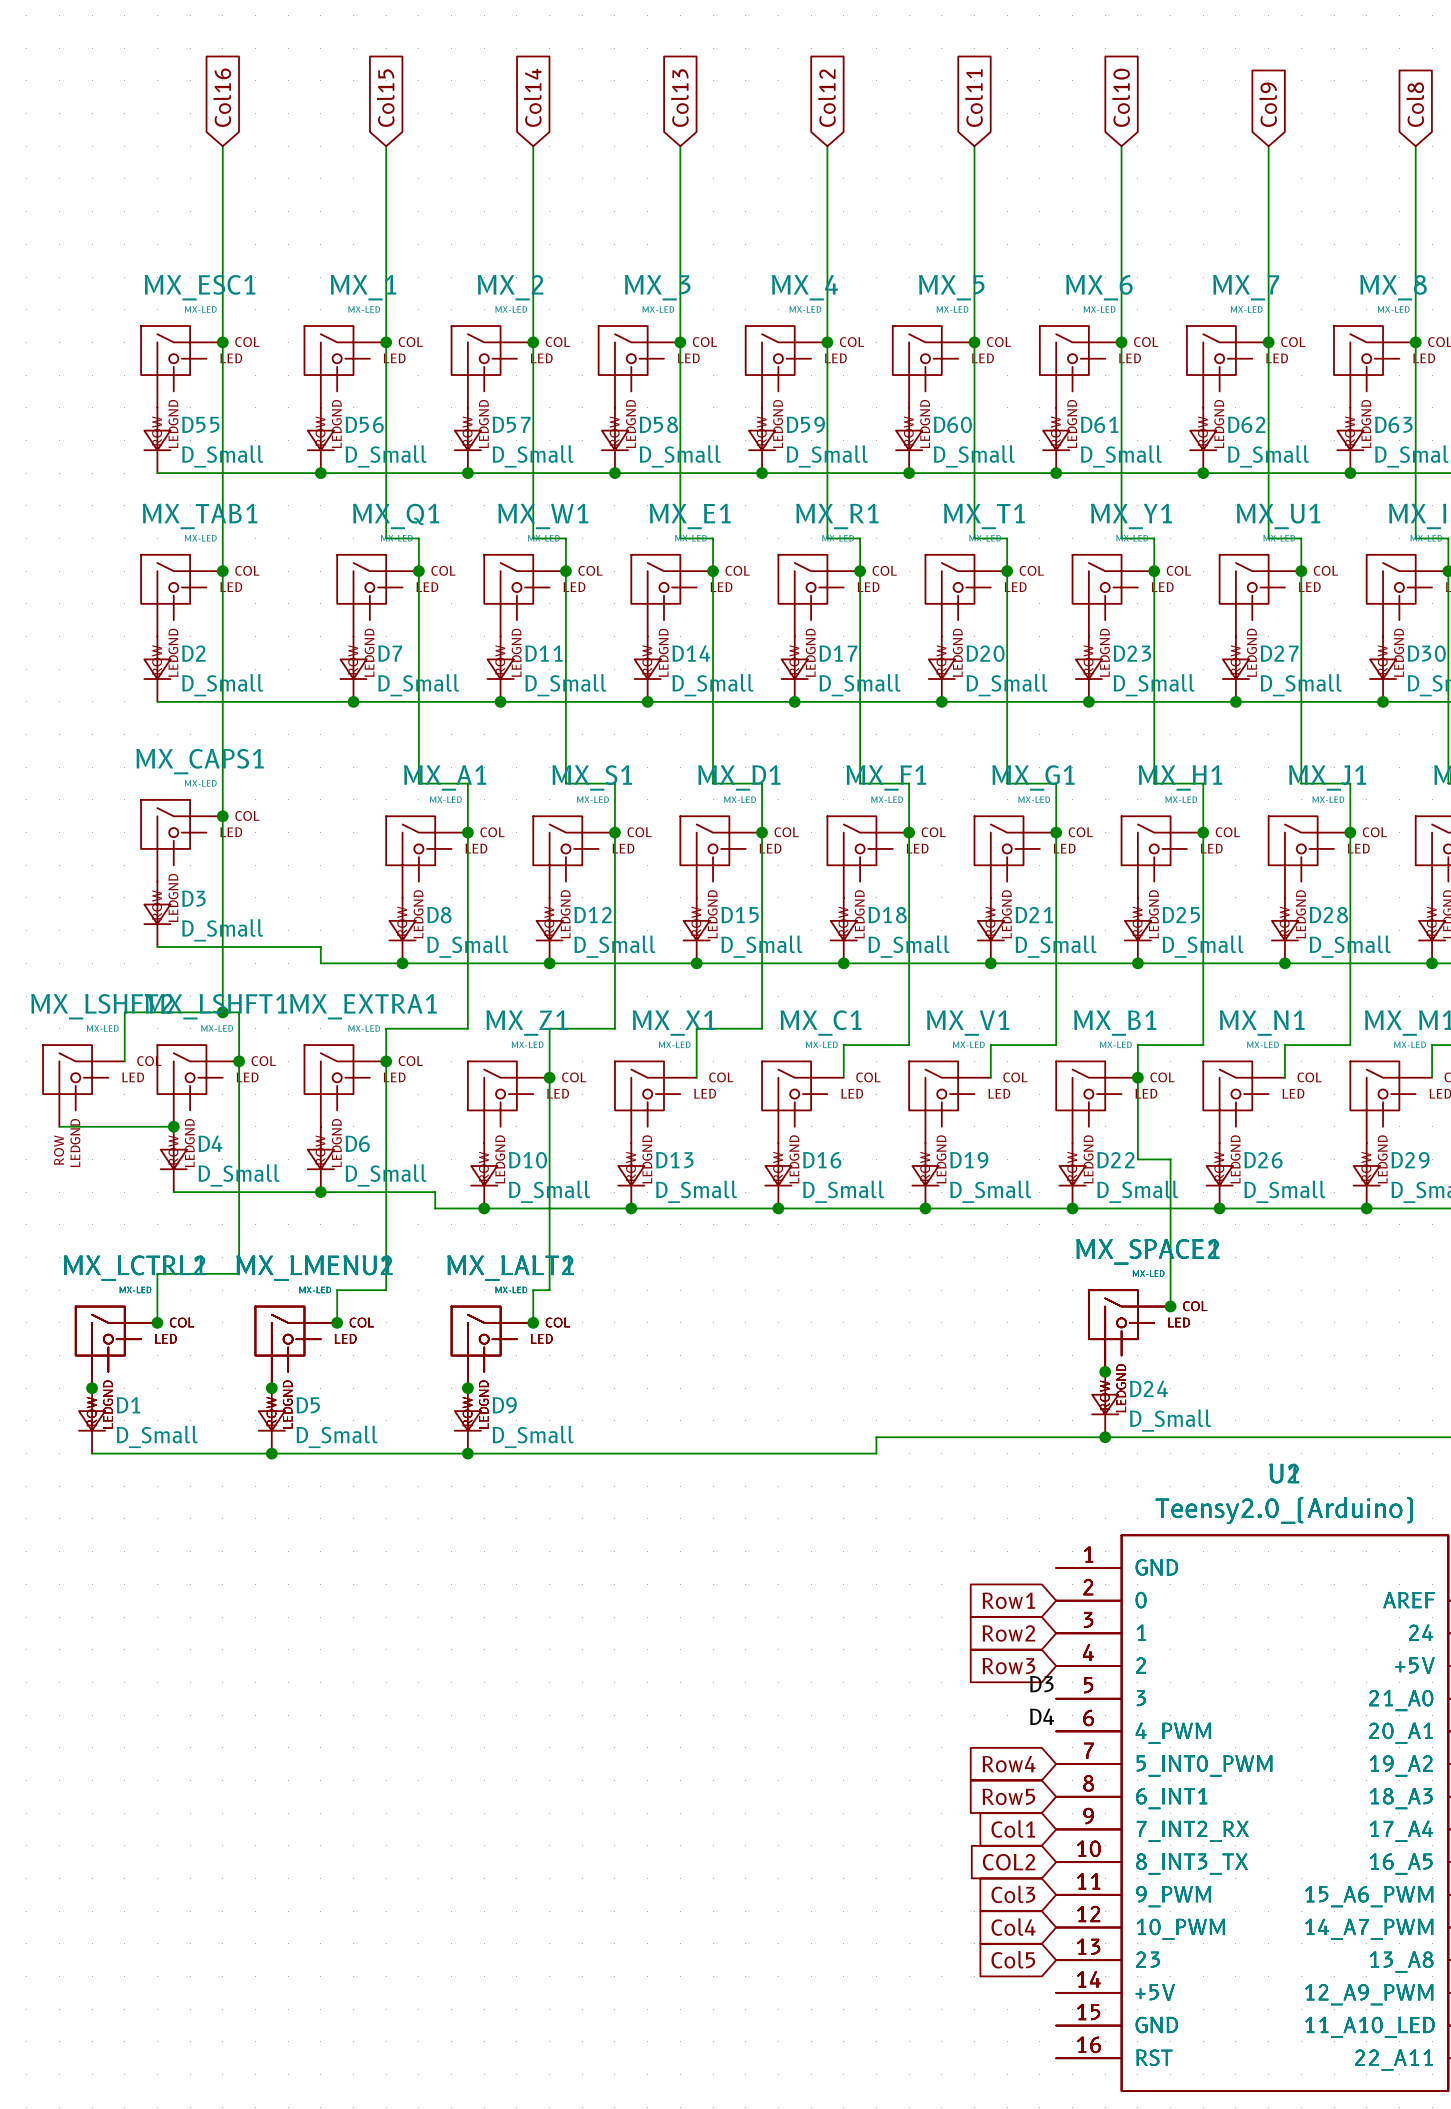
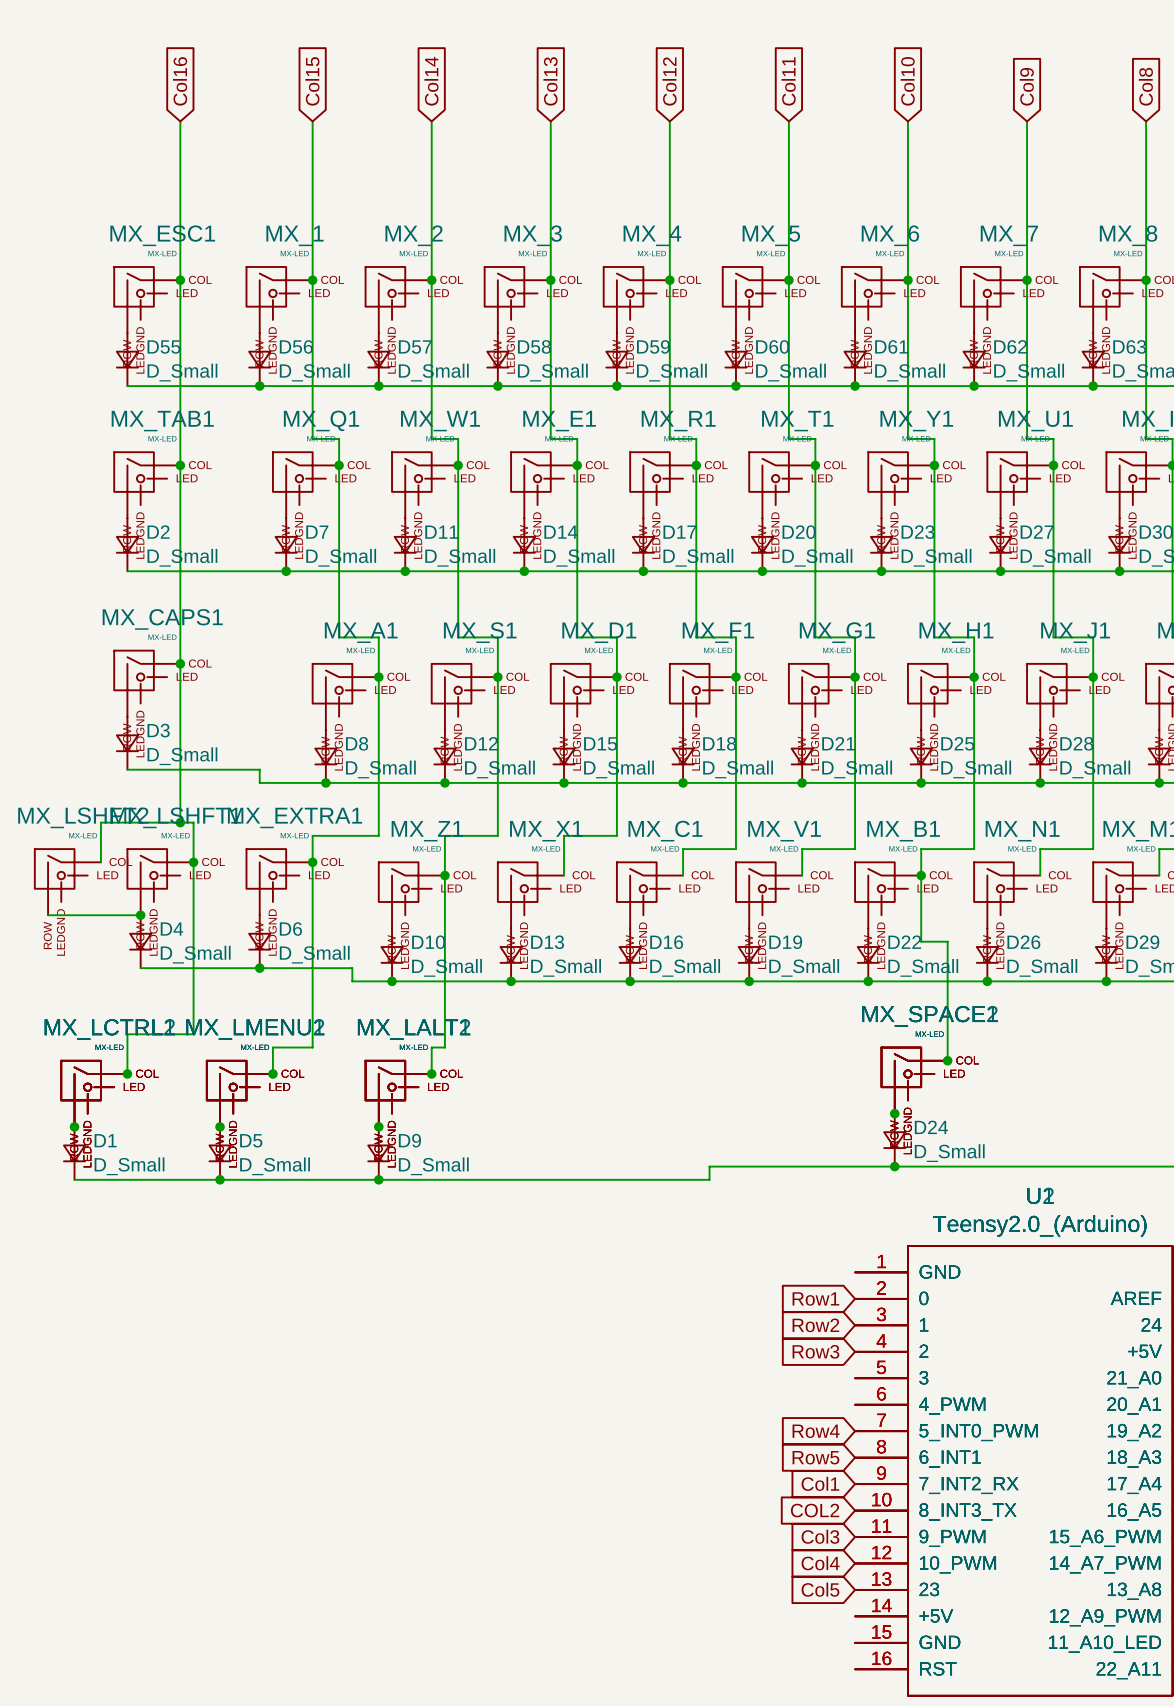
label: D3 (1041, 1684) -> none
label: D4 (1042, 1716) -> none

